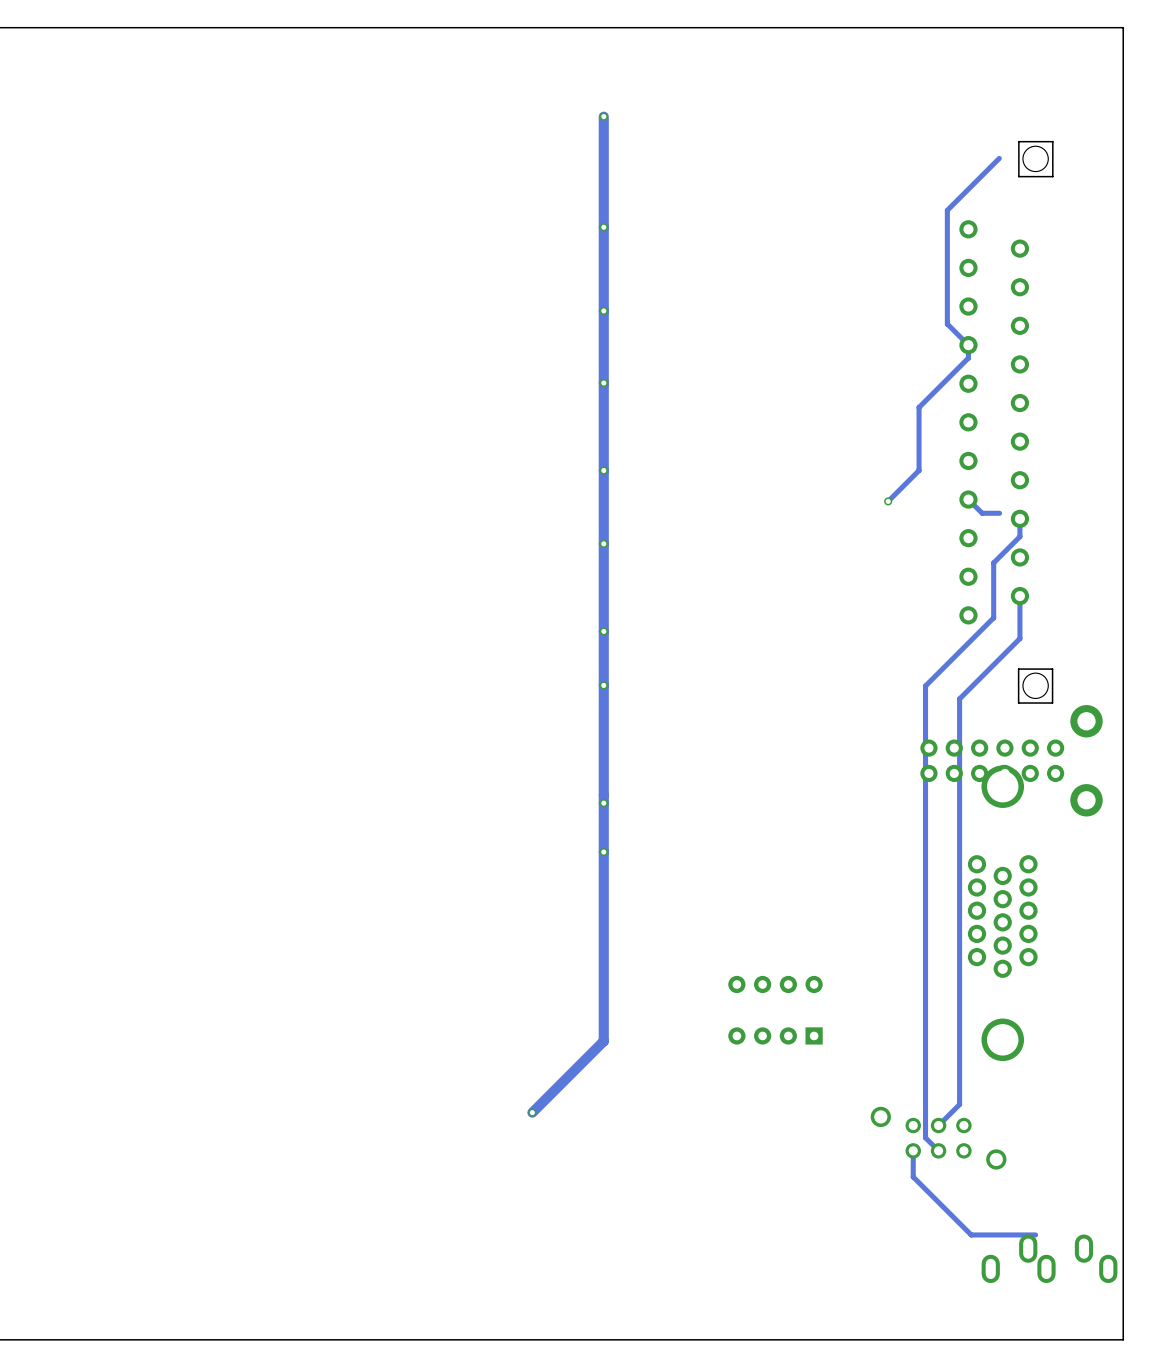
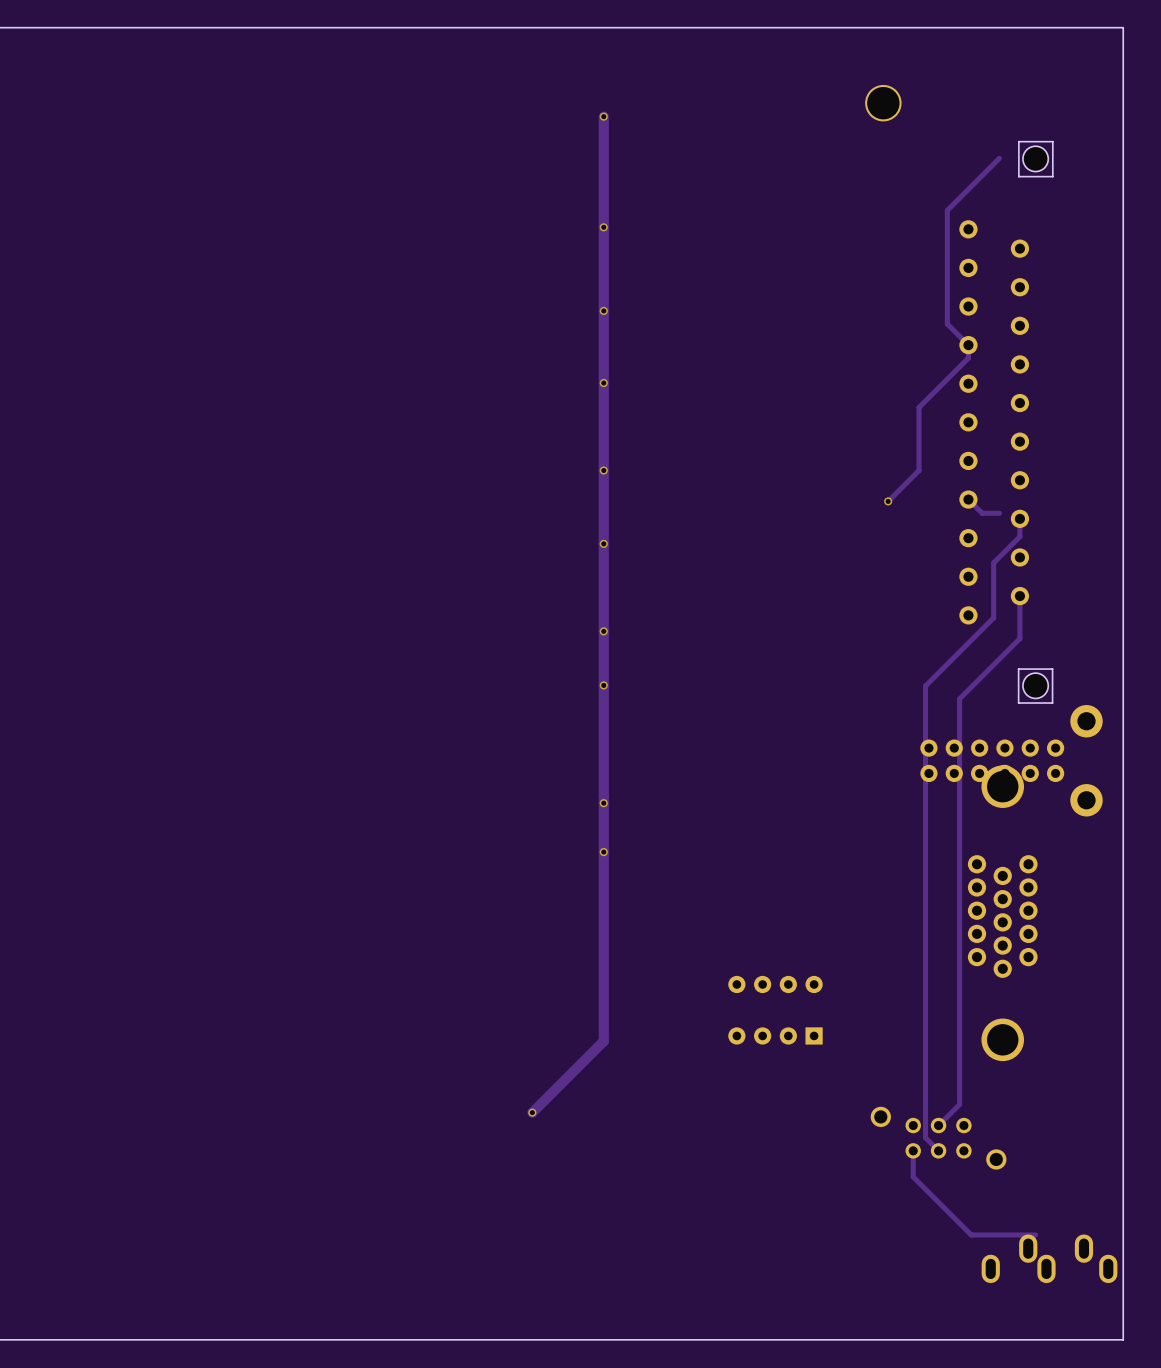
part: none -> (883, 103)

